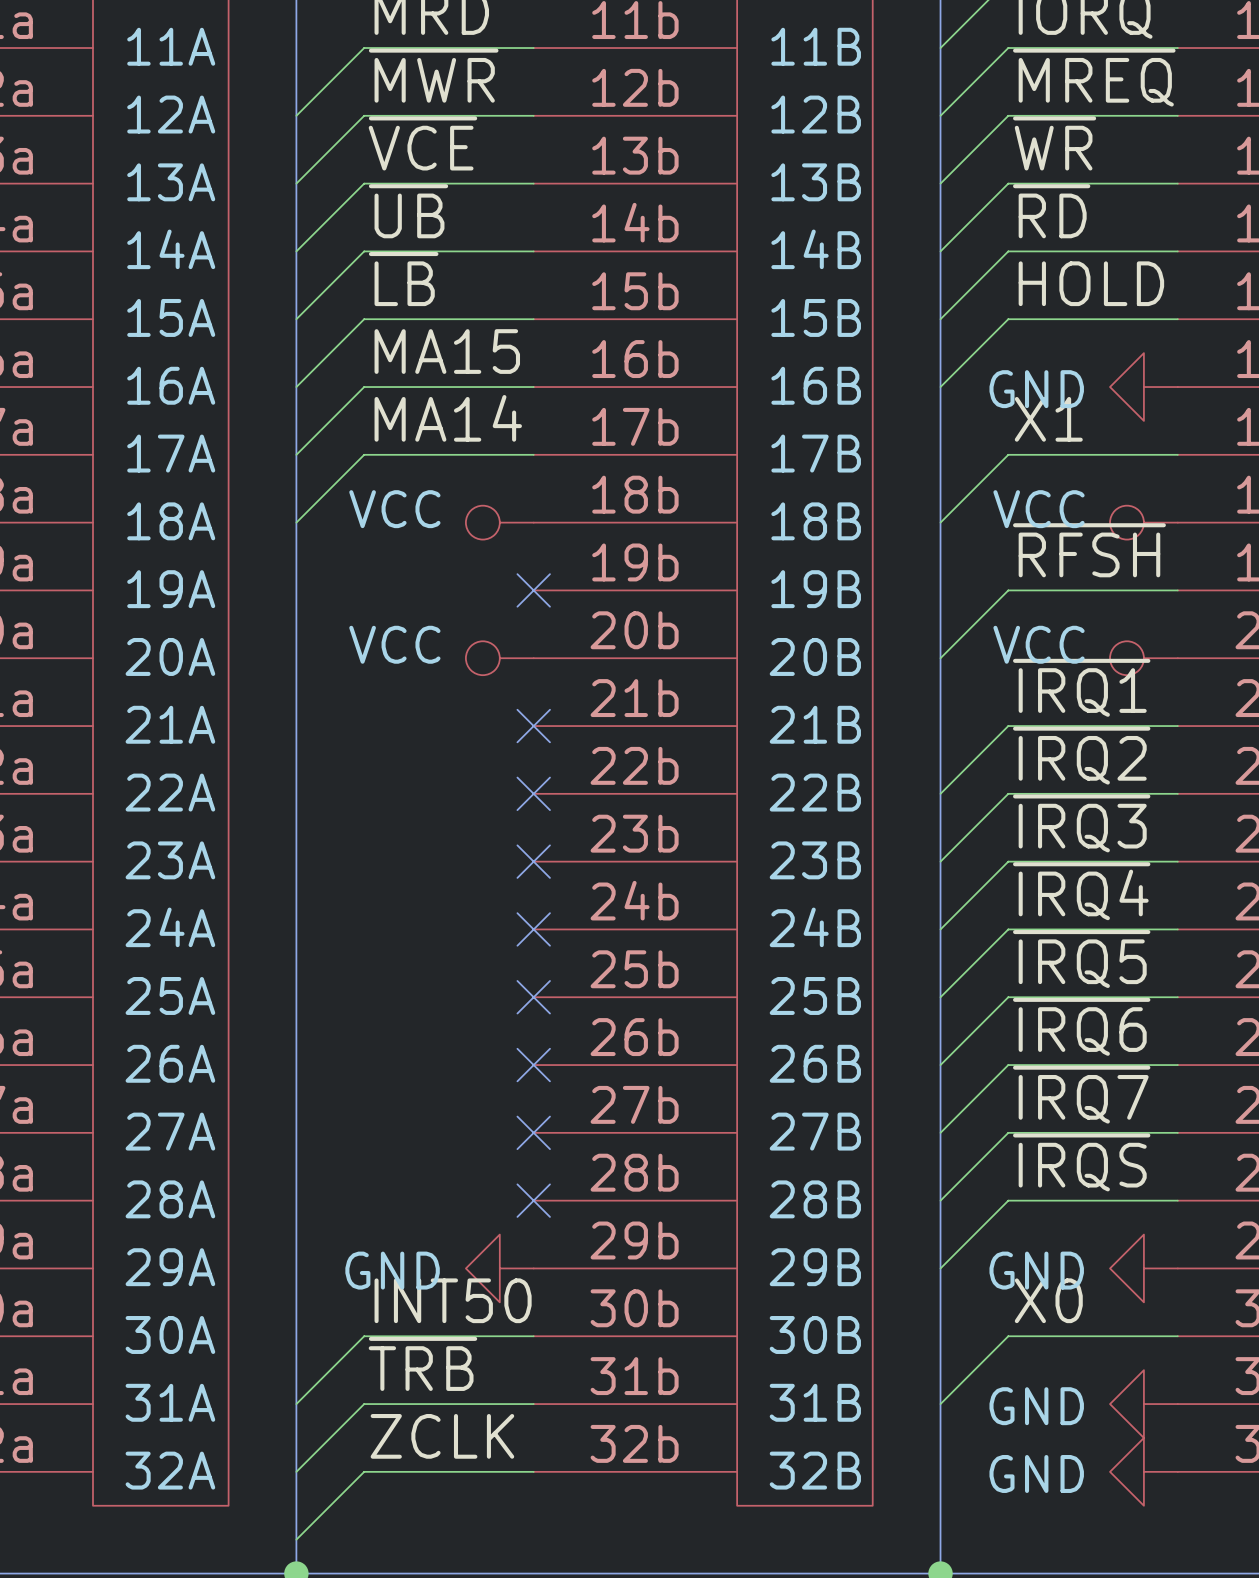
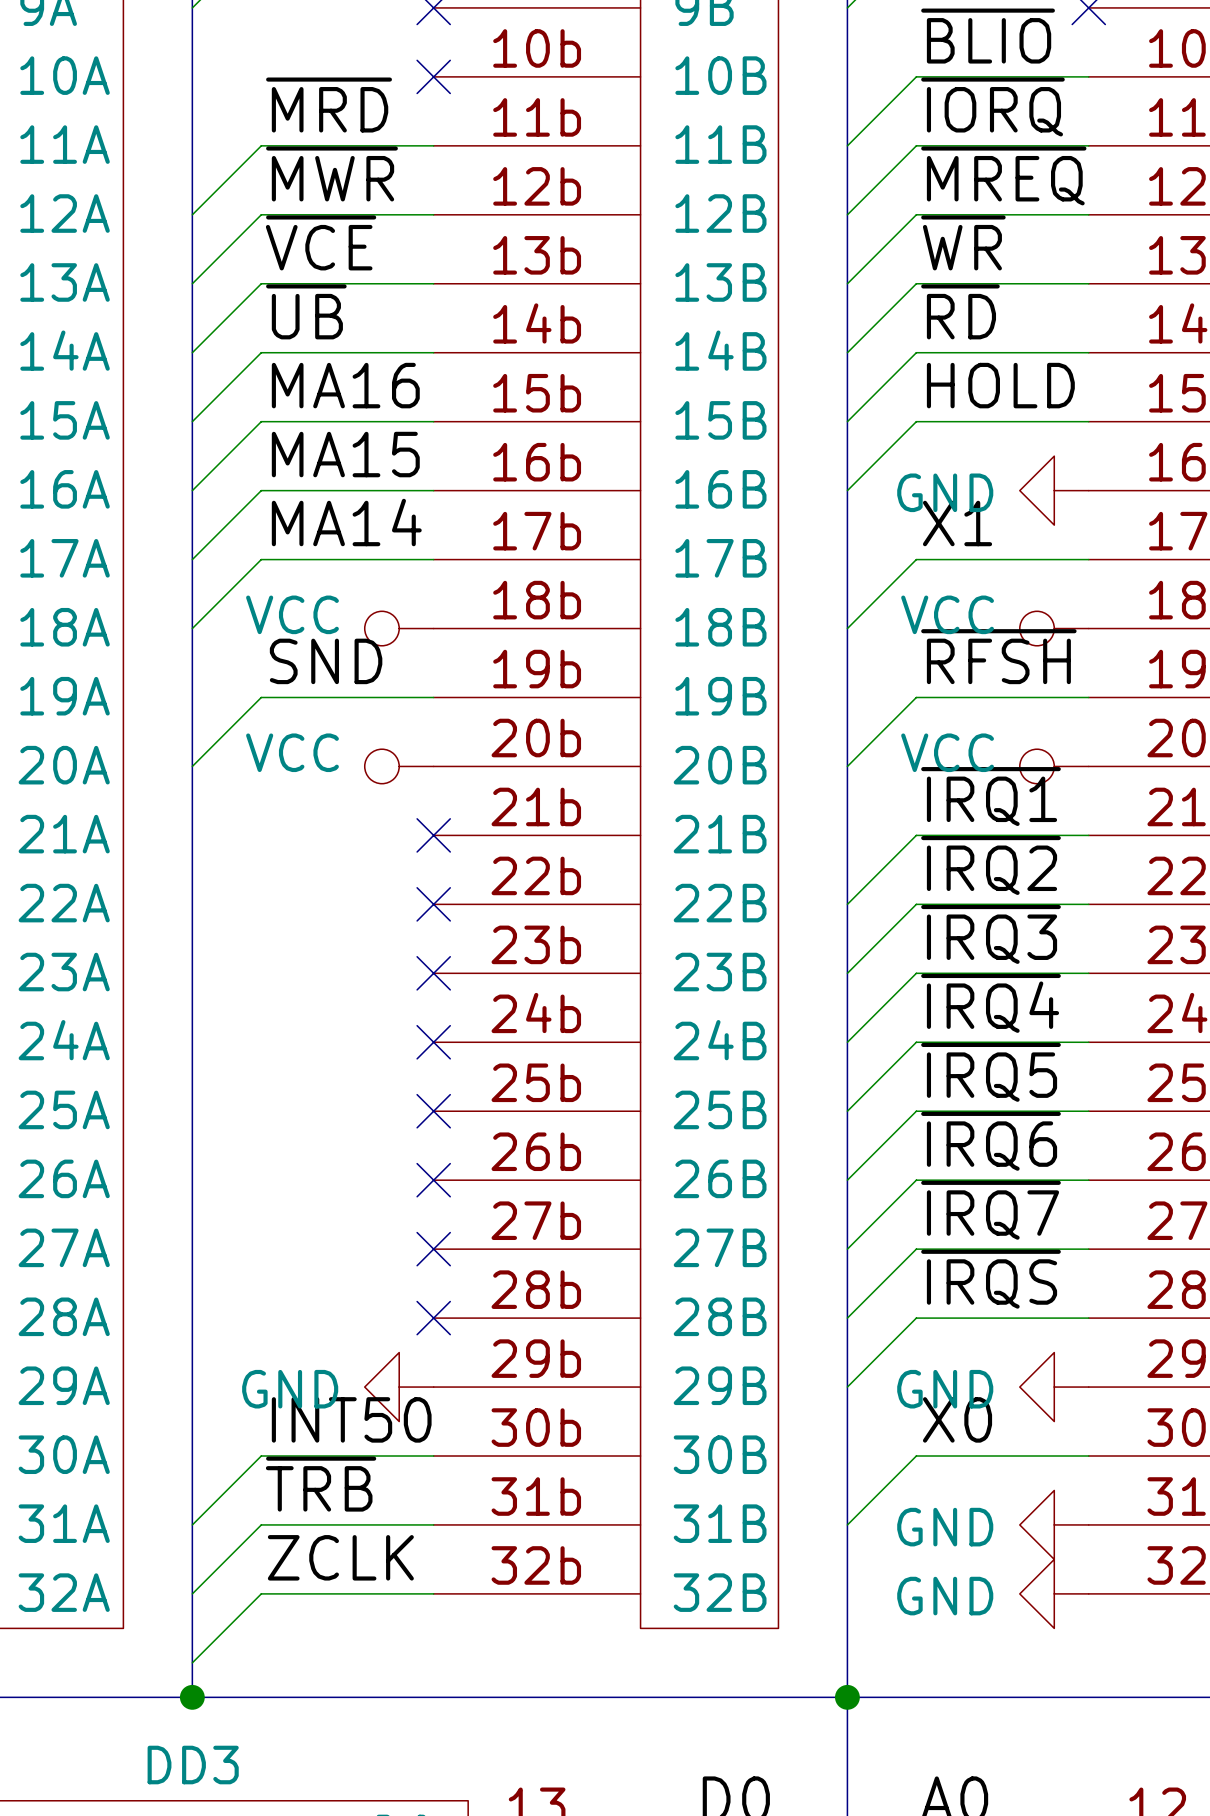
label: ~{LB} (403, 279) -> MA16 (345, 385)
label: none -> SND (326, 661)
wire: none -> (433, 697) (261, 697) (192, 766)
no-connect mark: (533, 590) -> none

